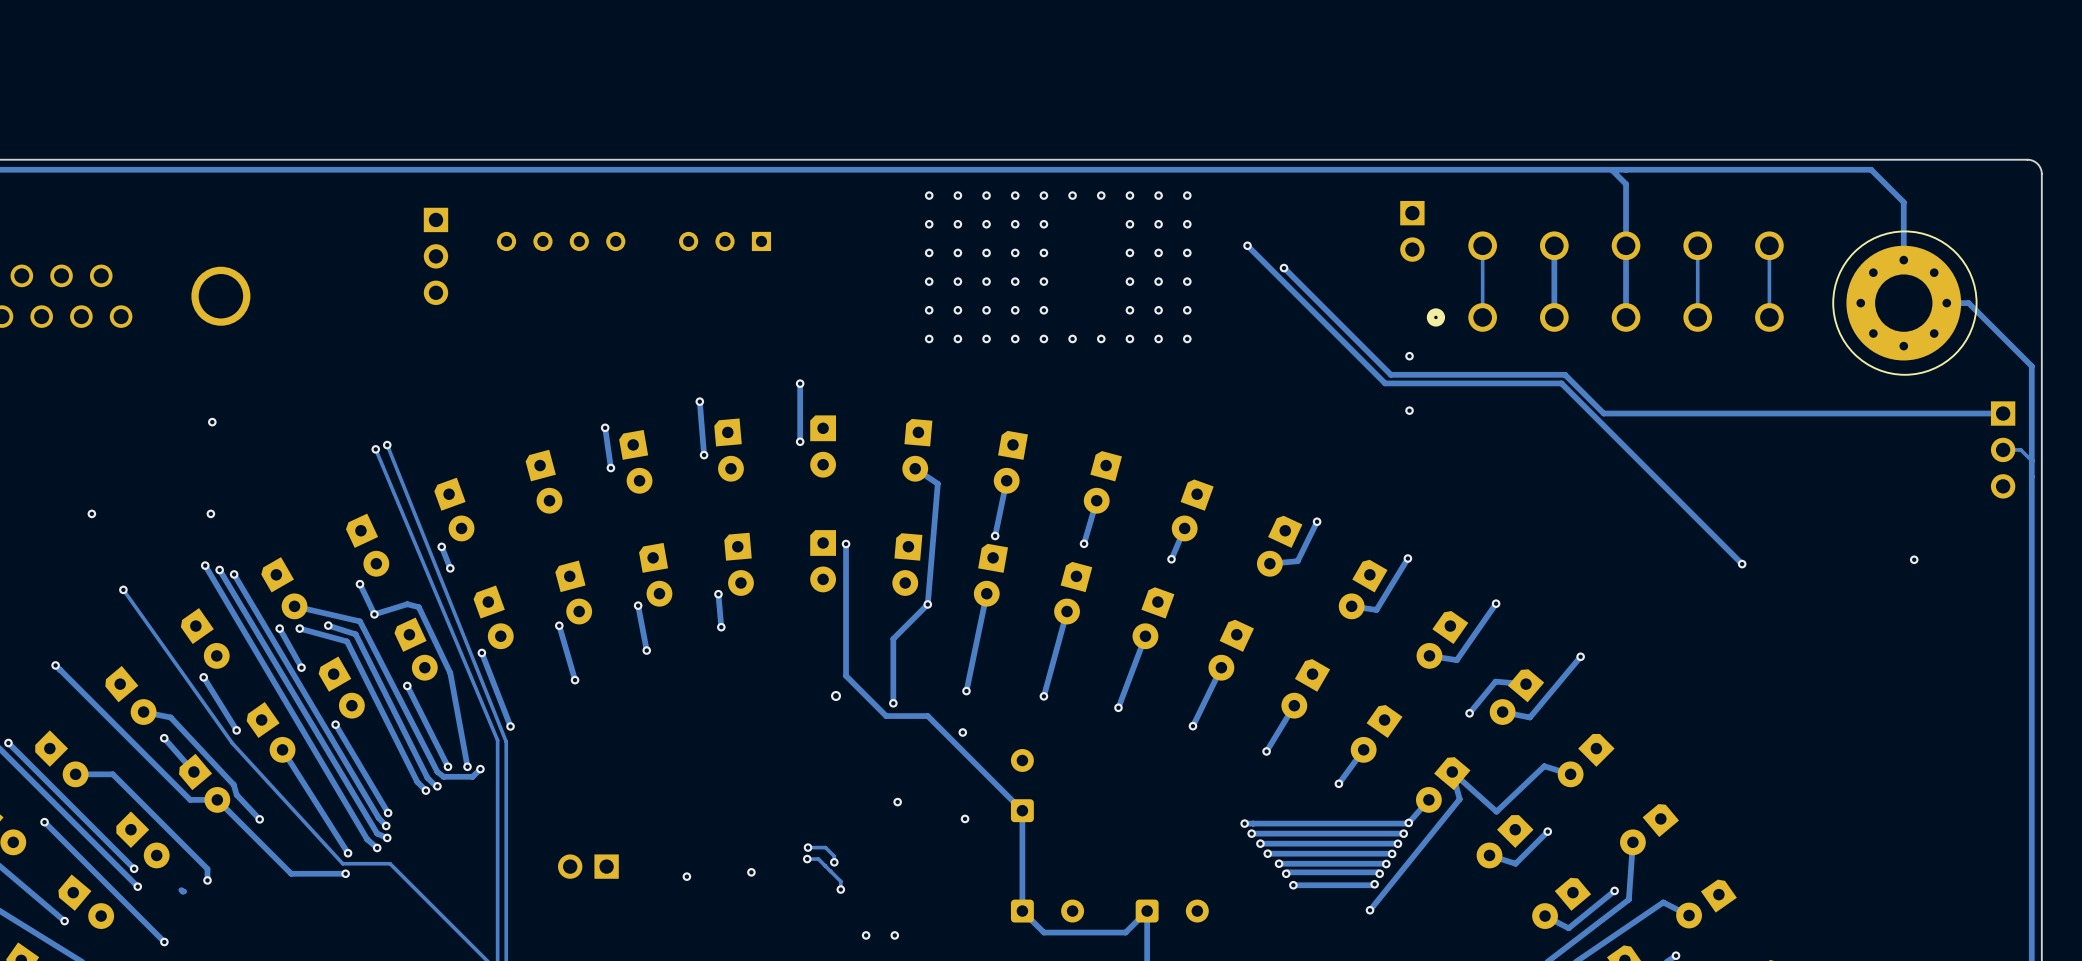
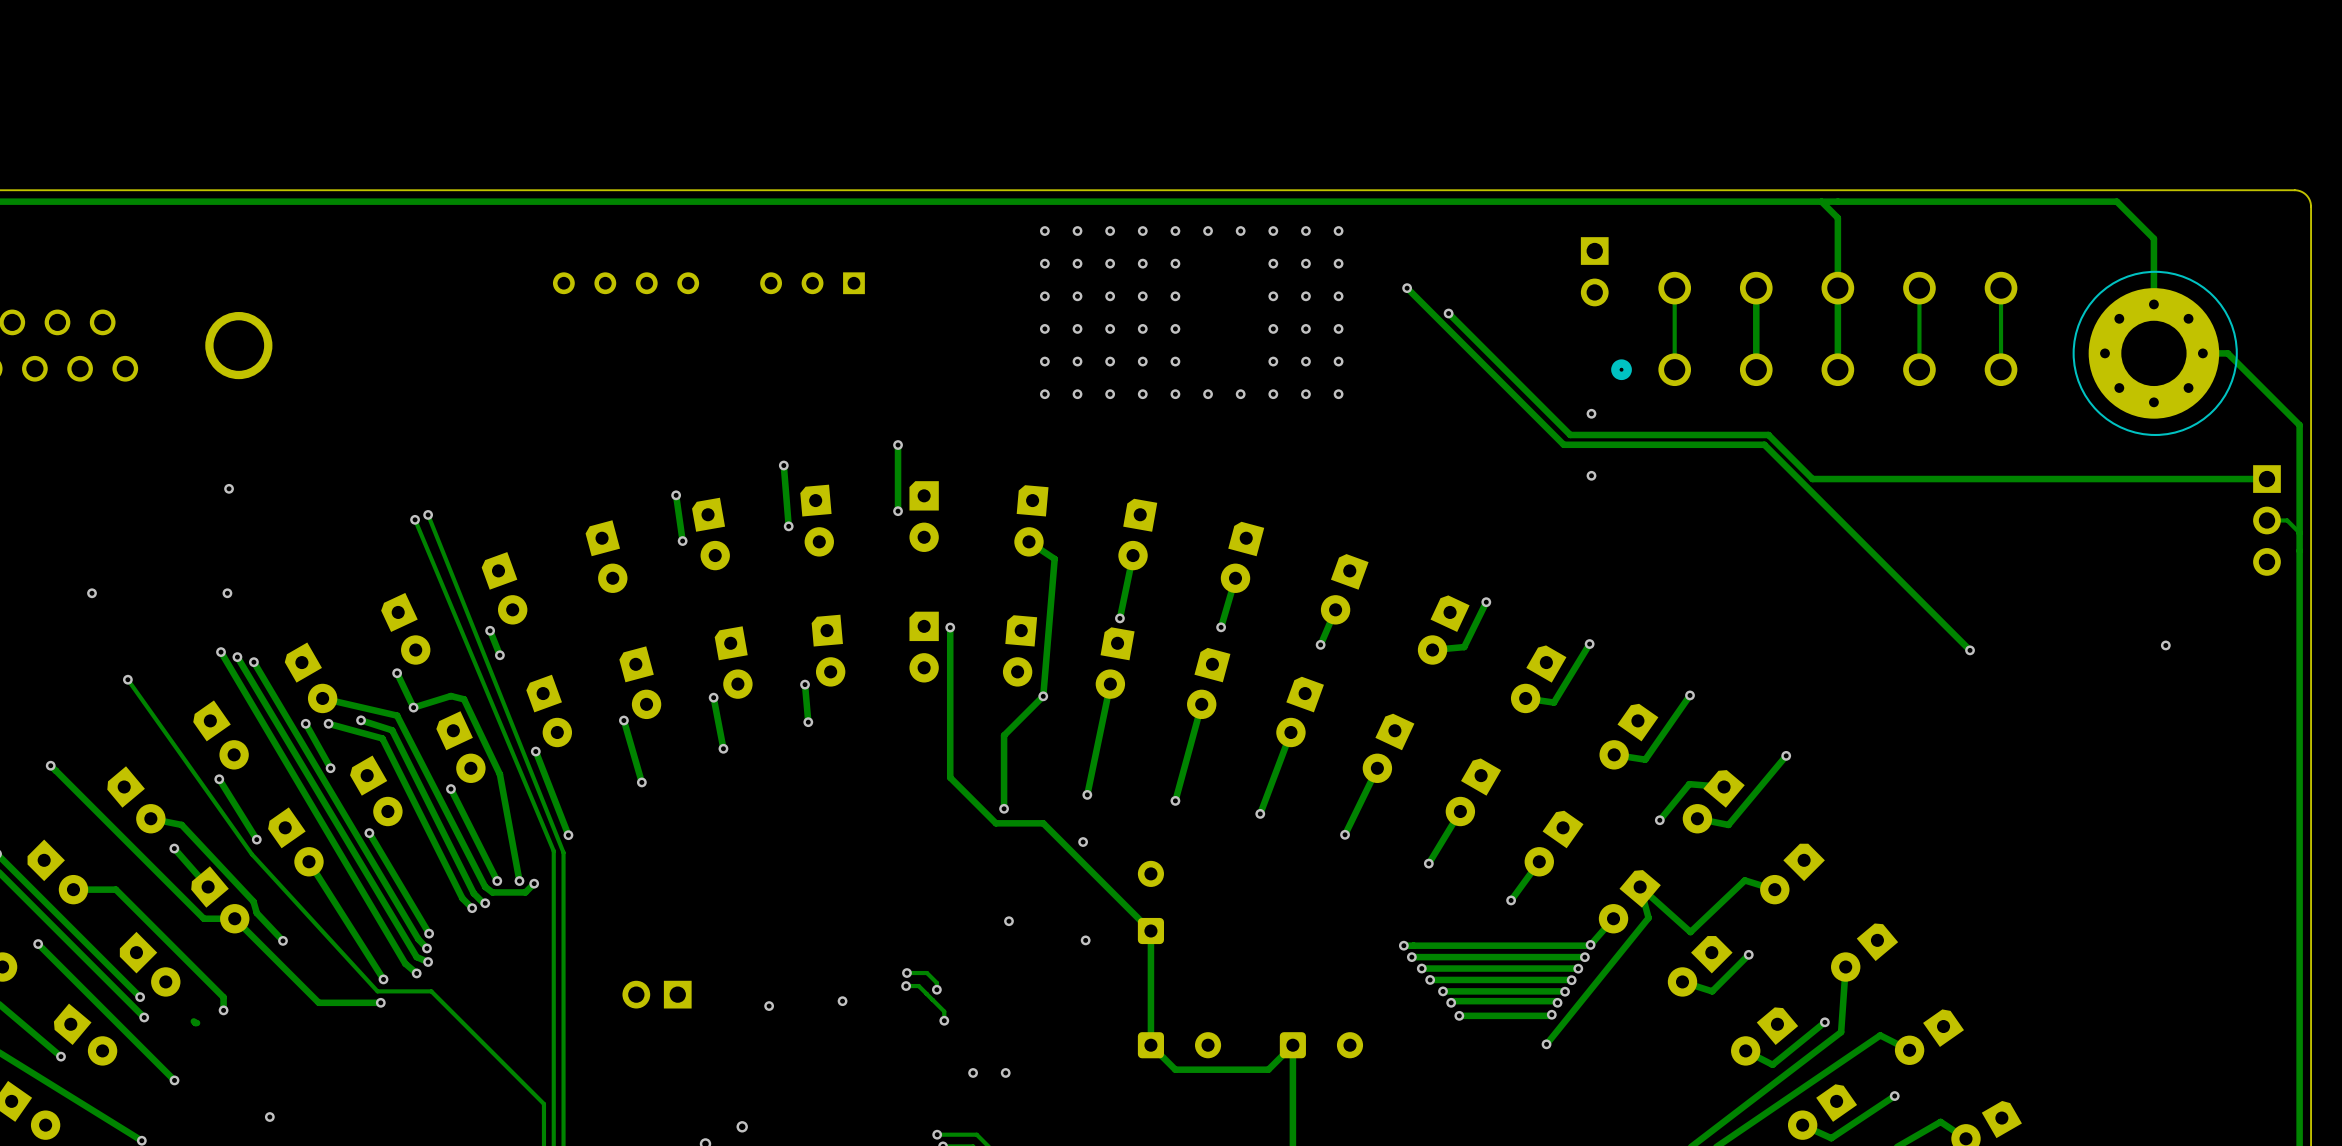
part: (435, 256) -> none
via: (836, 695) -> none

